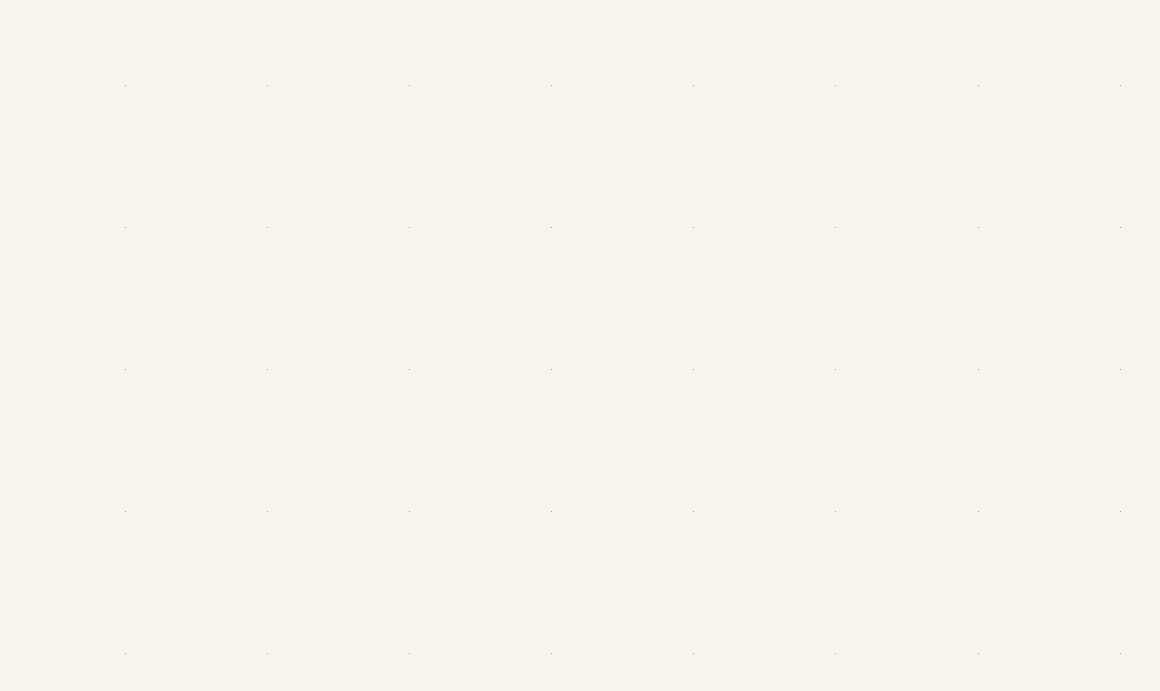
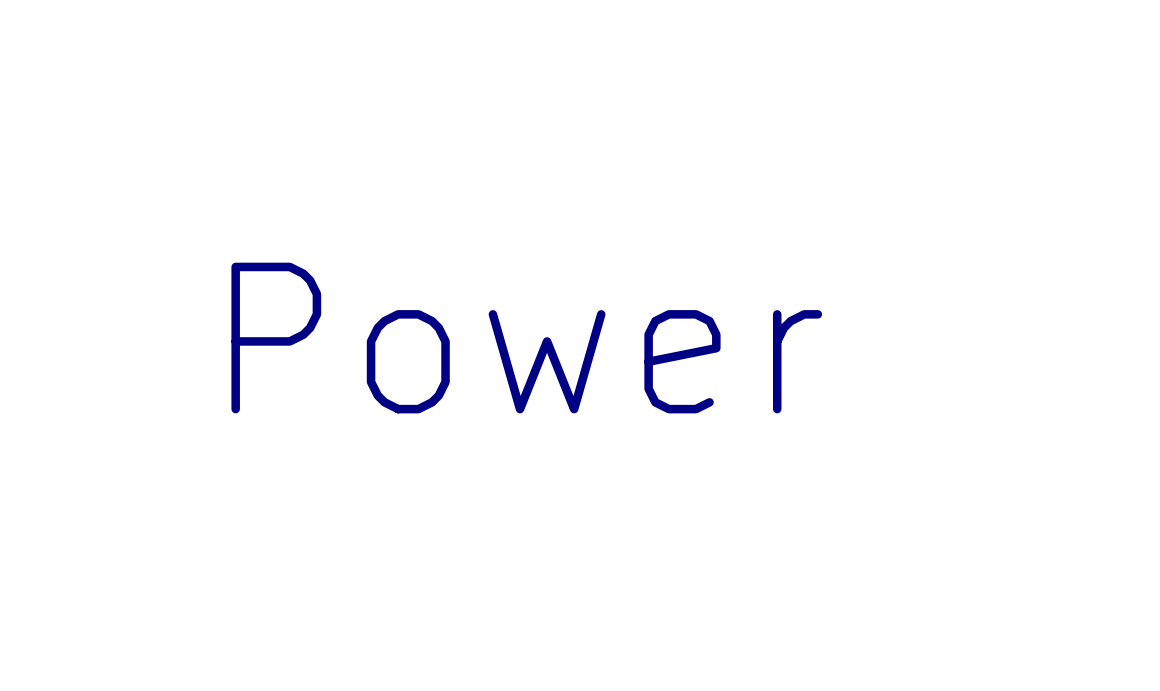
text: none -> Power (526, 338)

